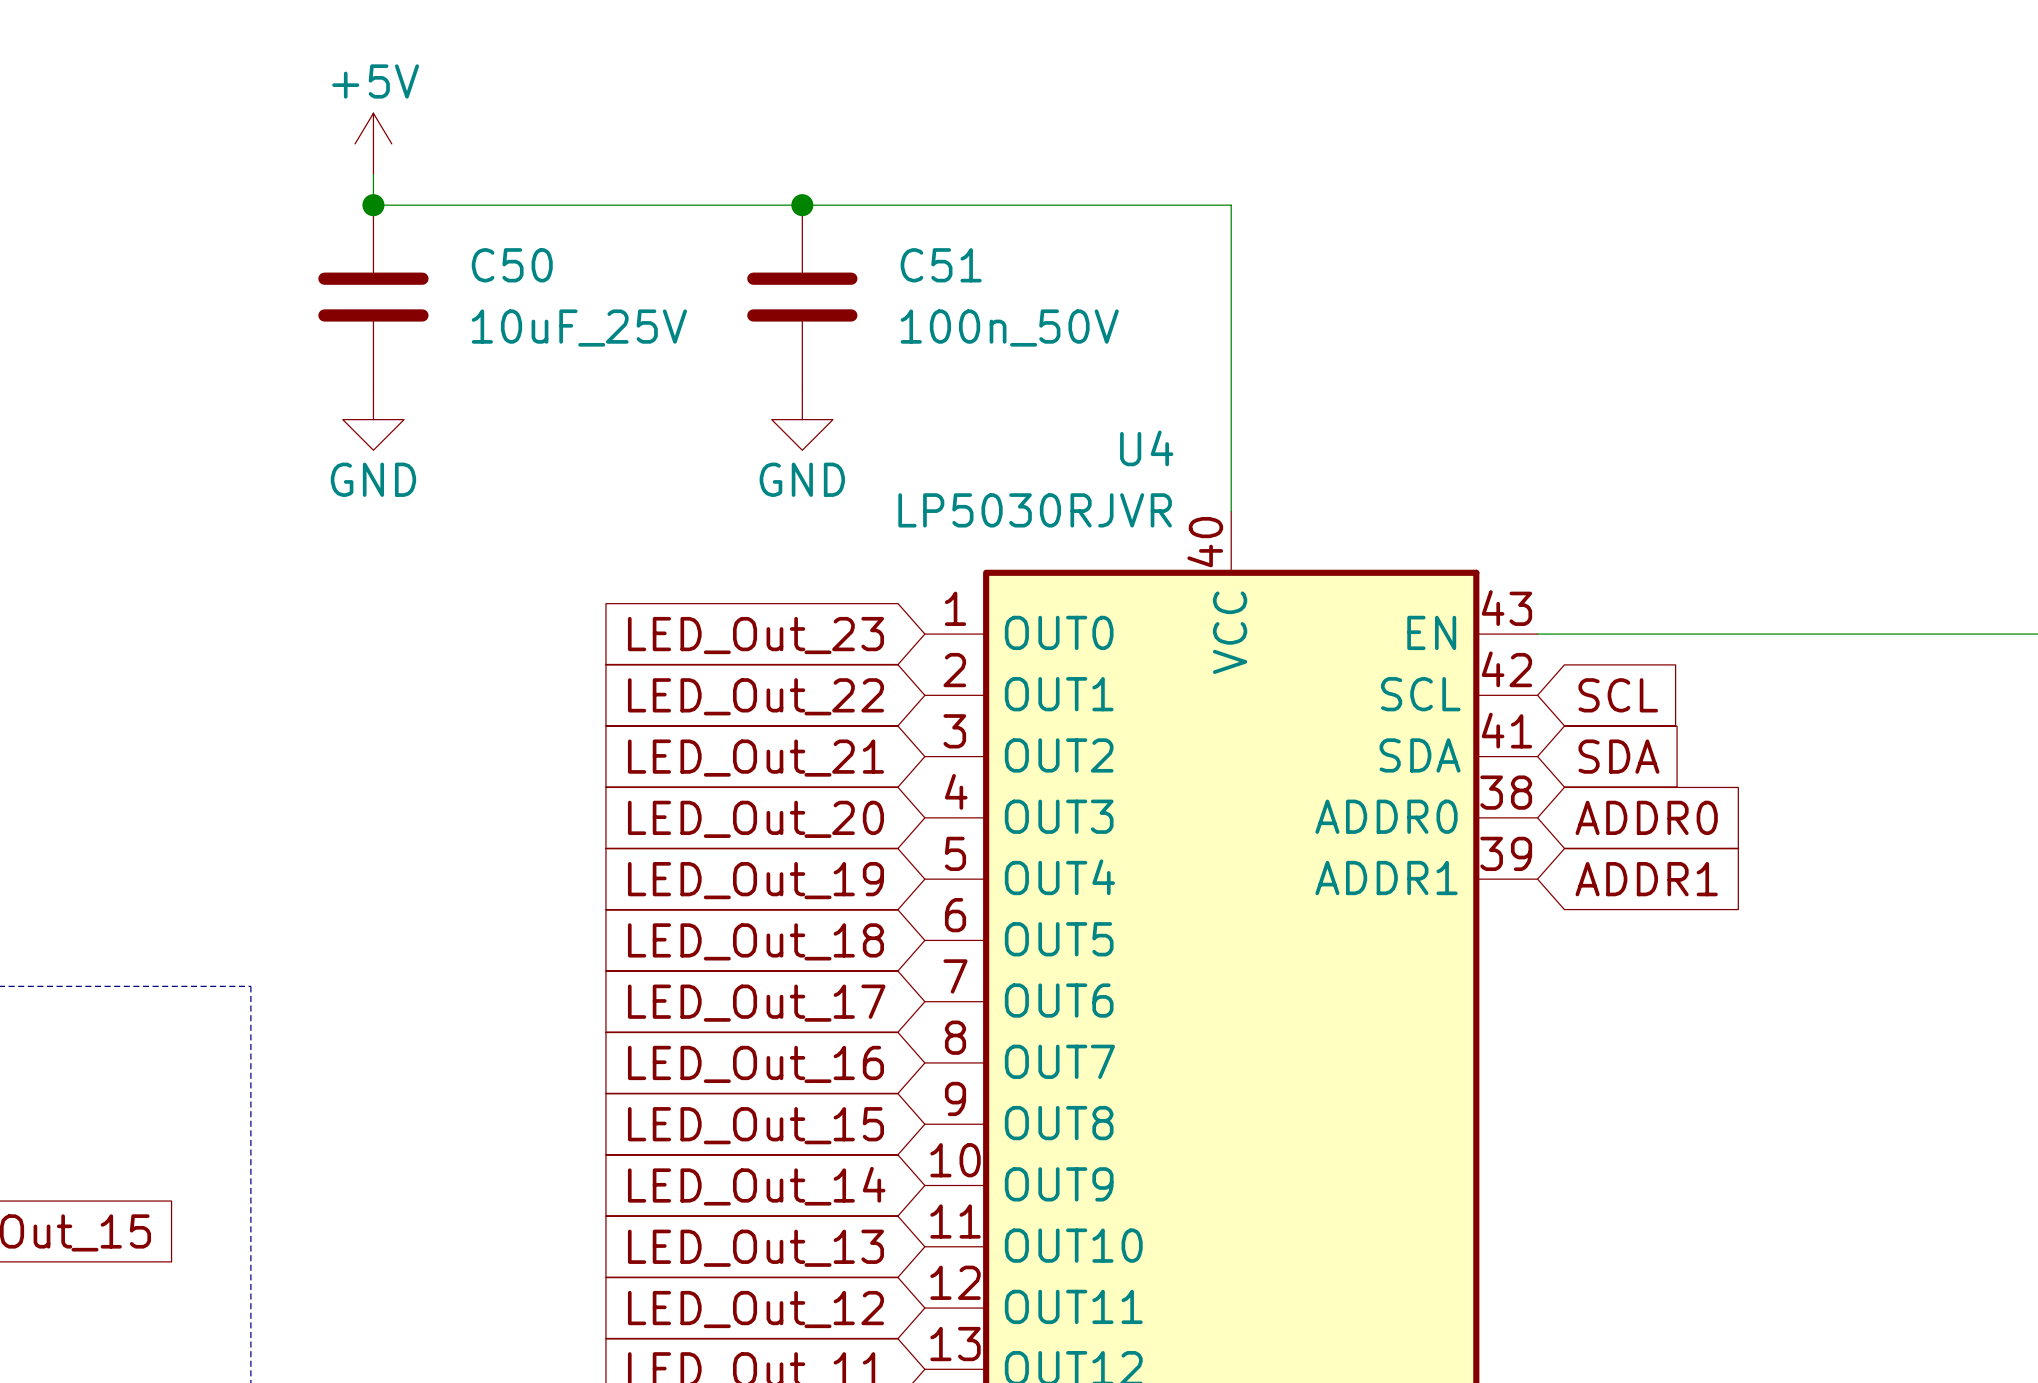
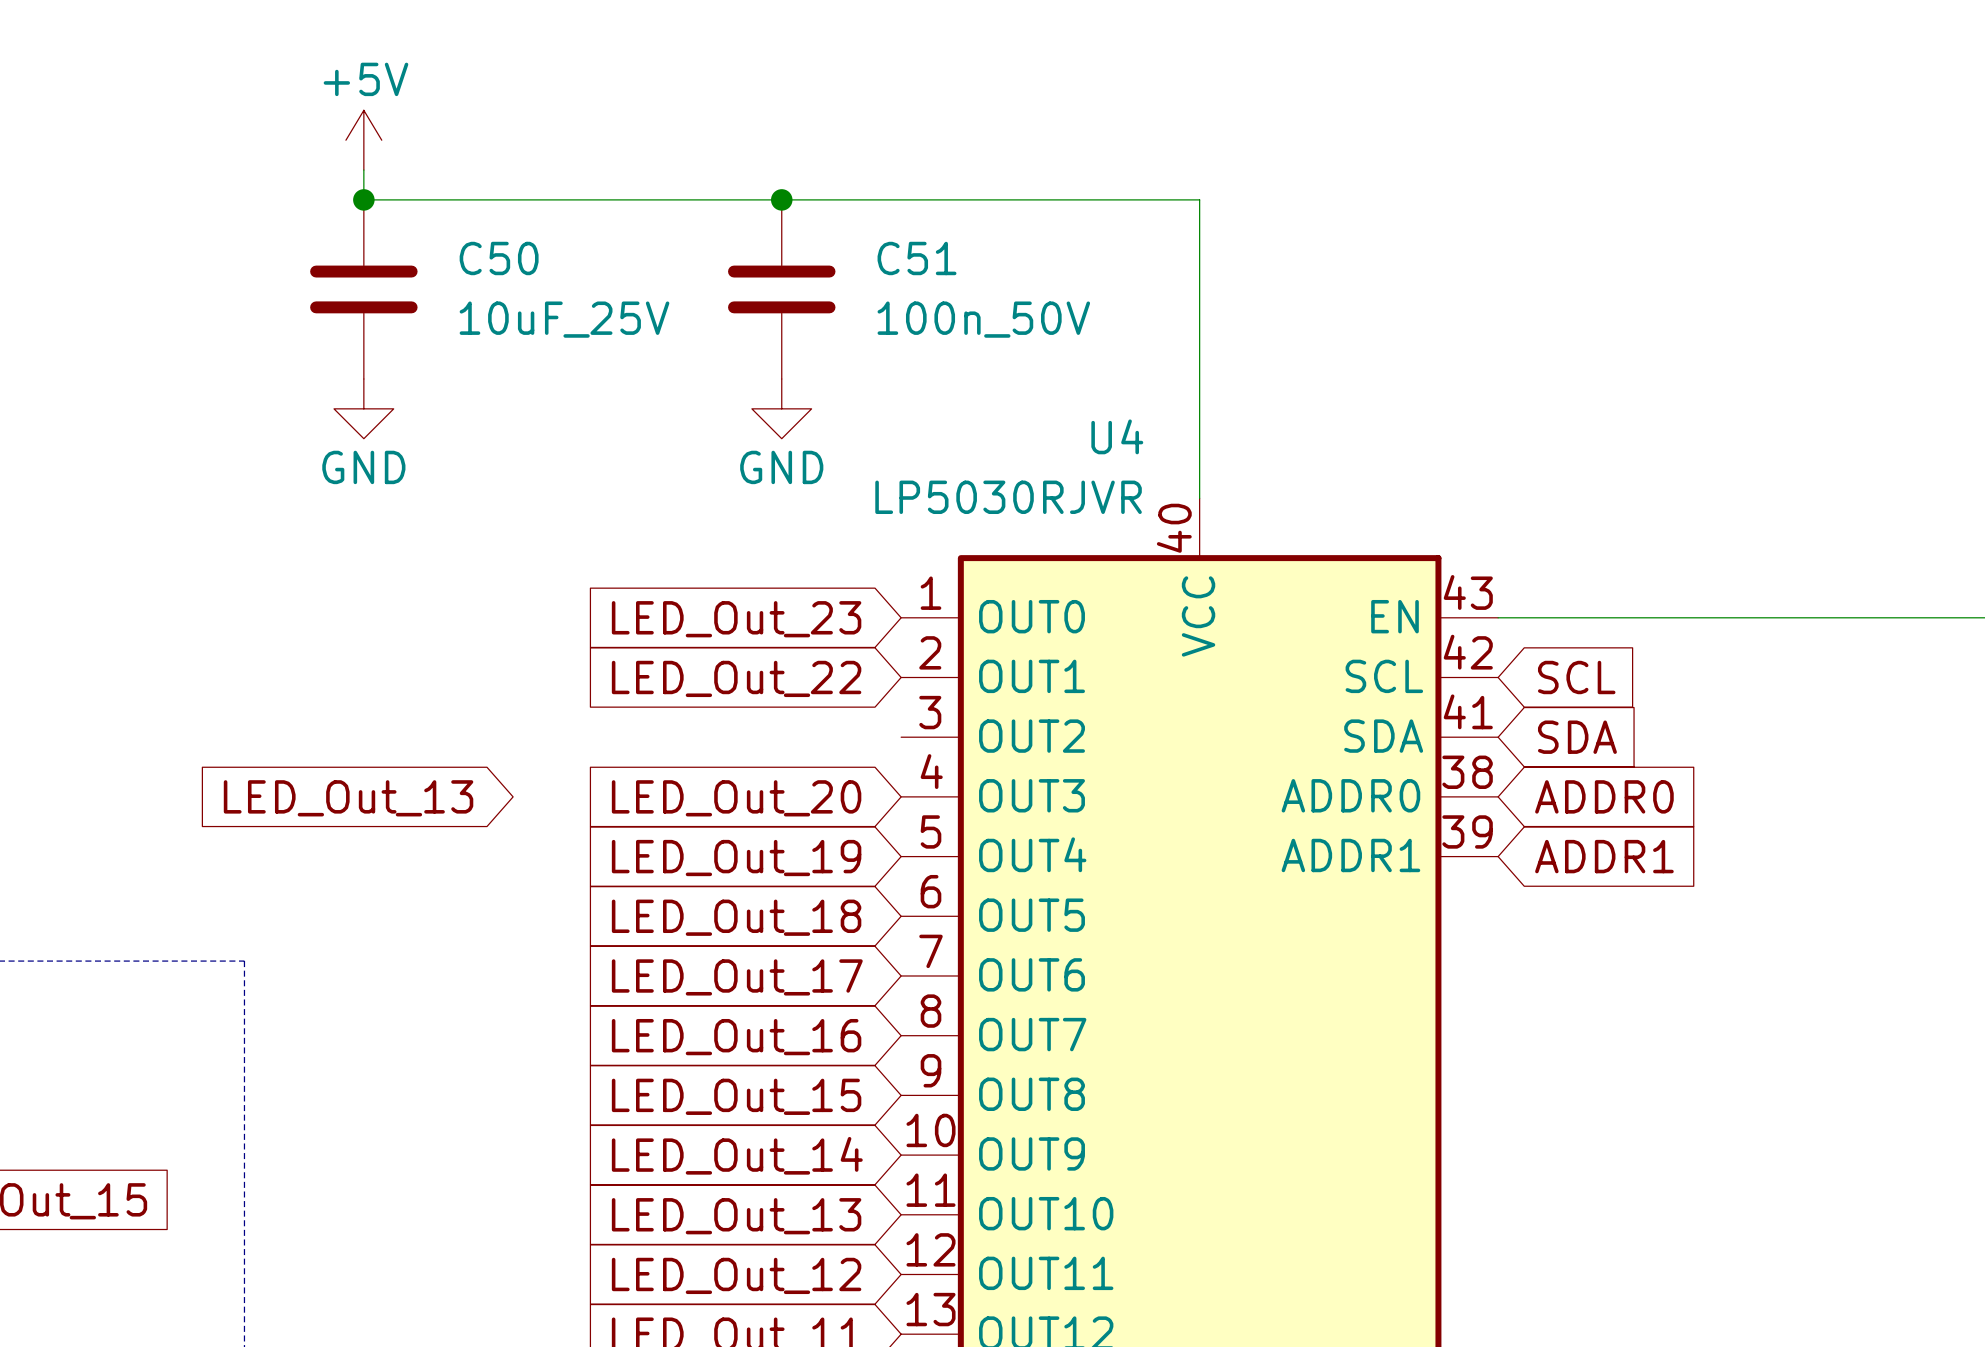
global label: LED_Out_21 (755, 758) -> none
global label: none -> LED_Out_13 (348, 798)

